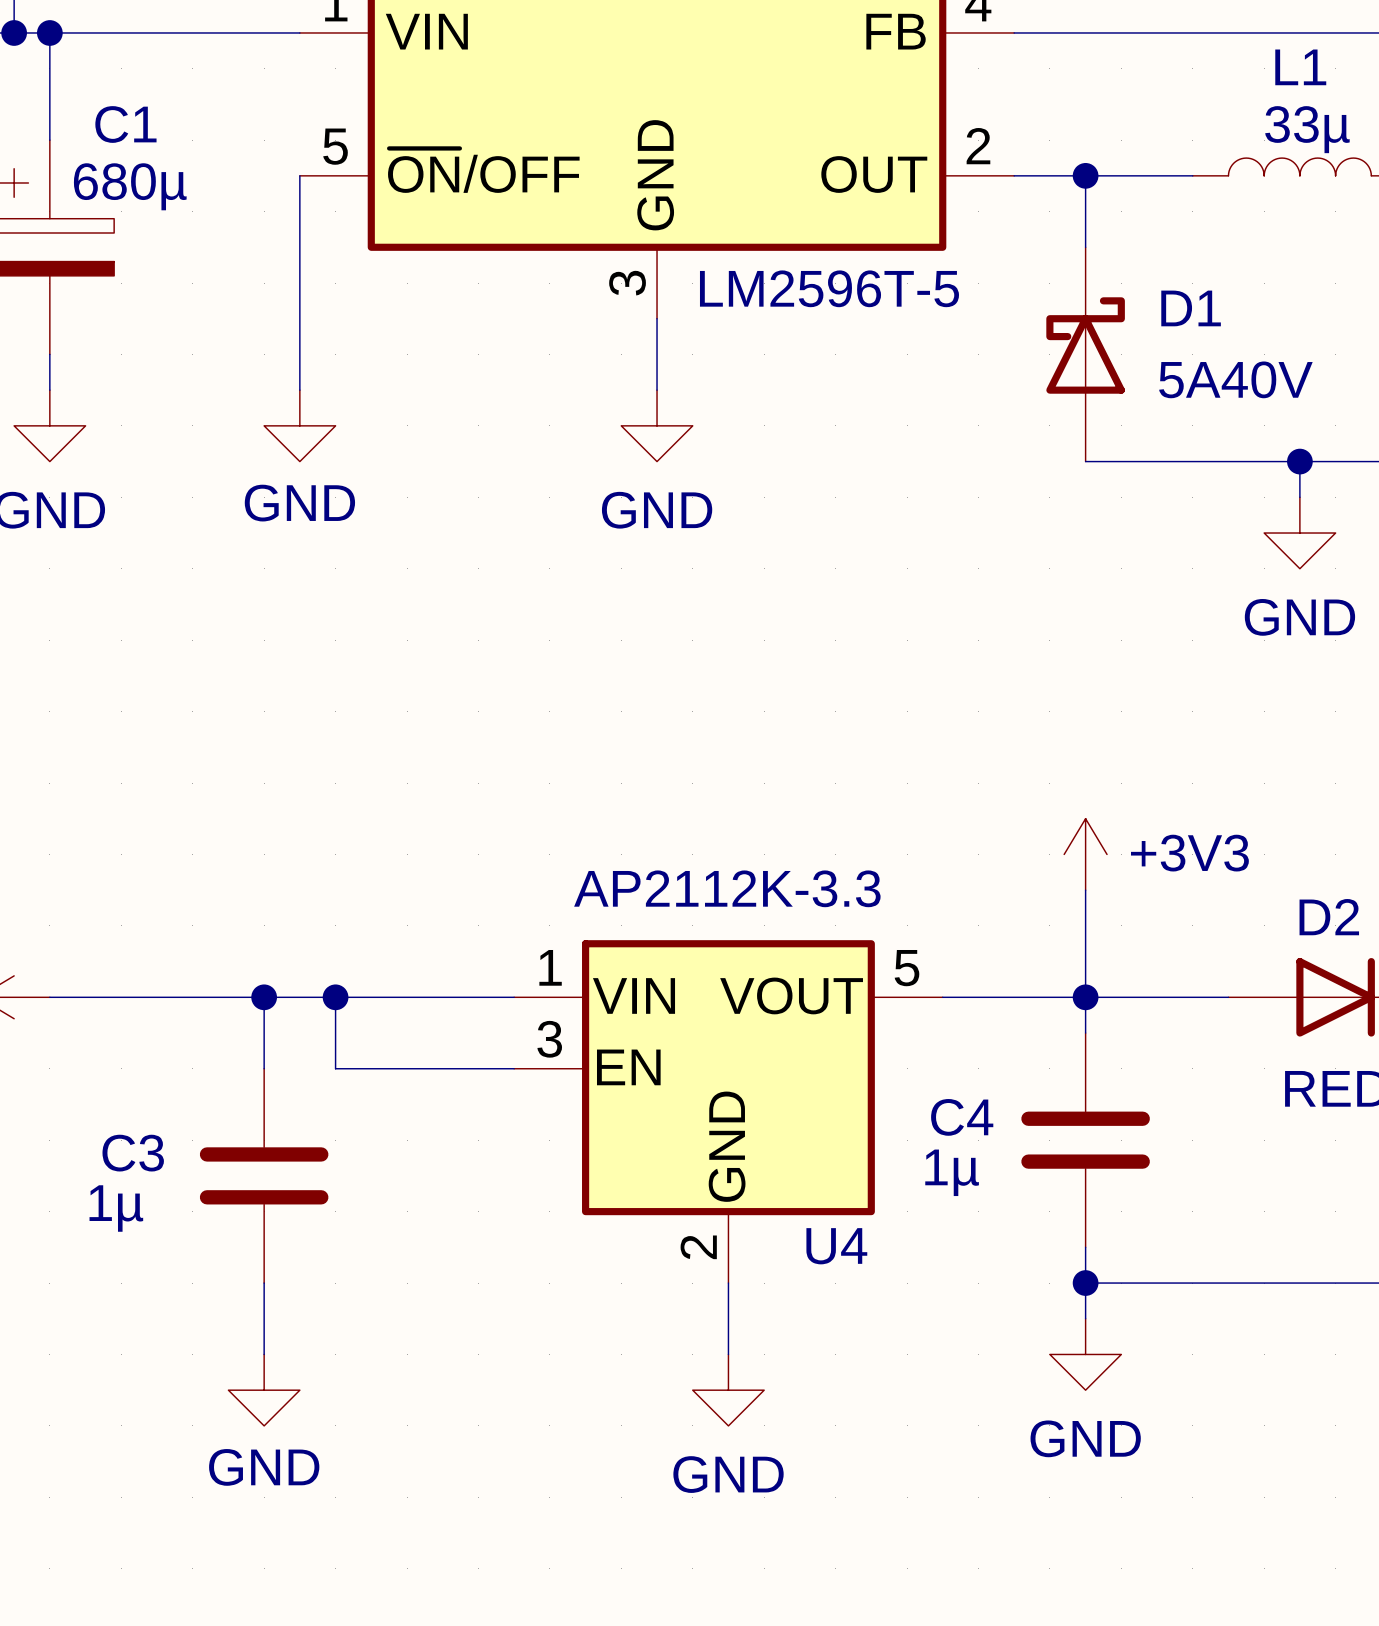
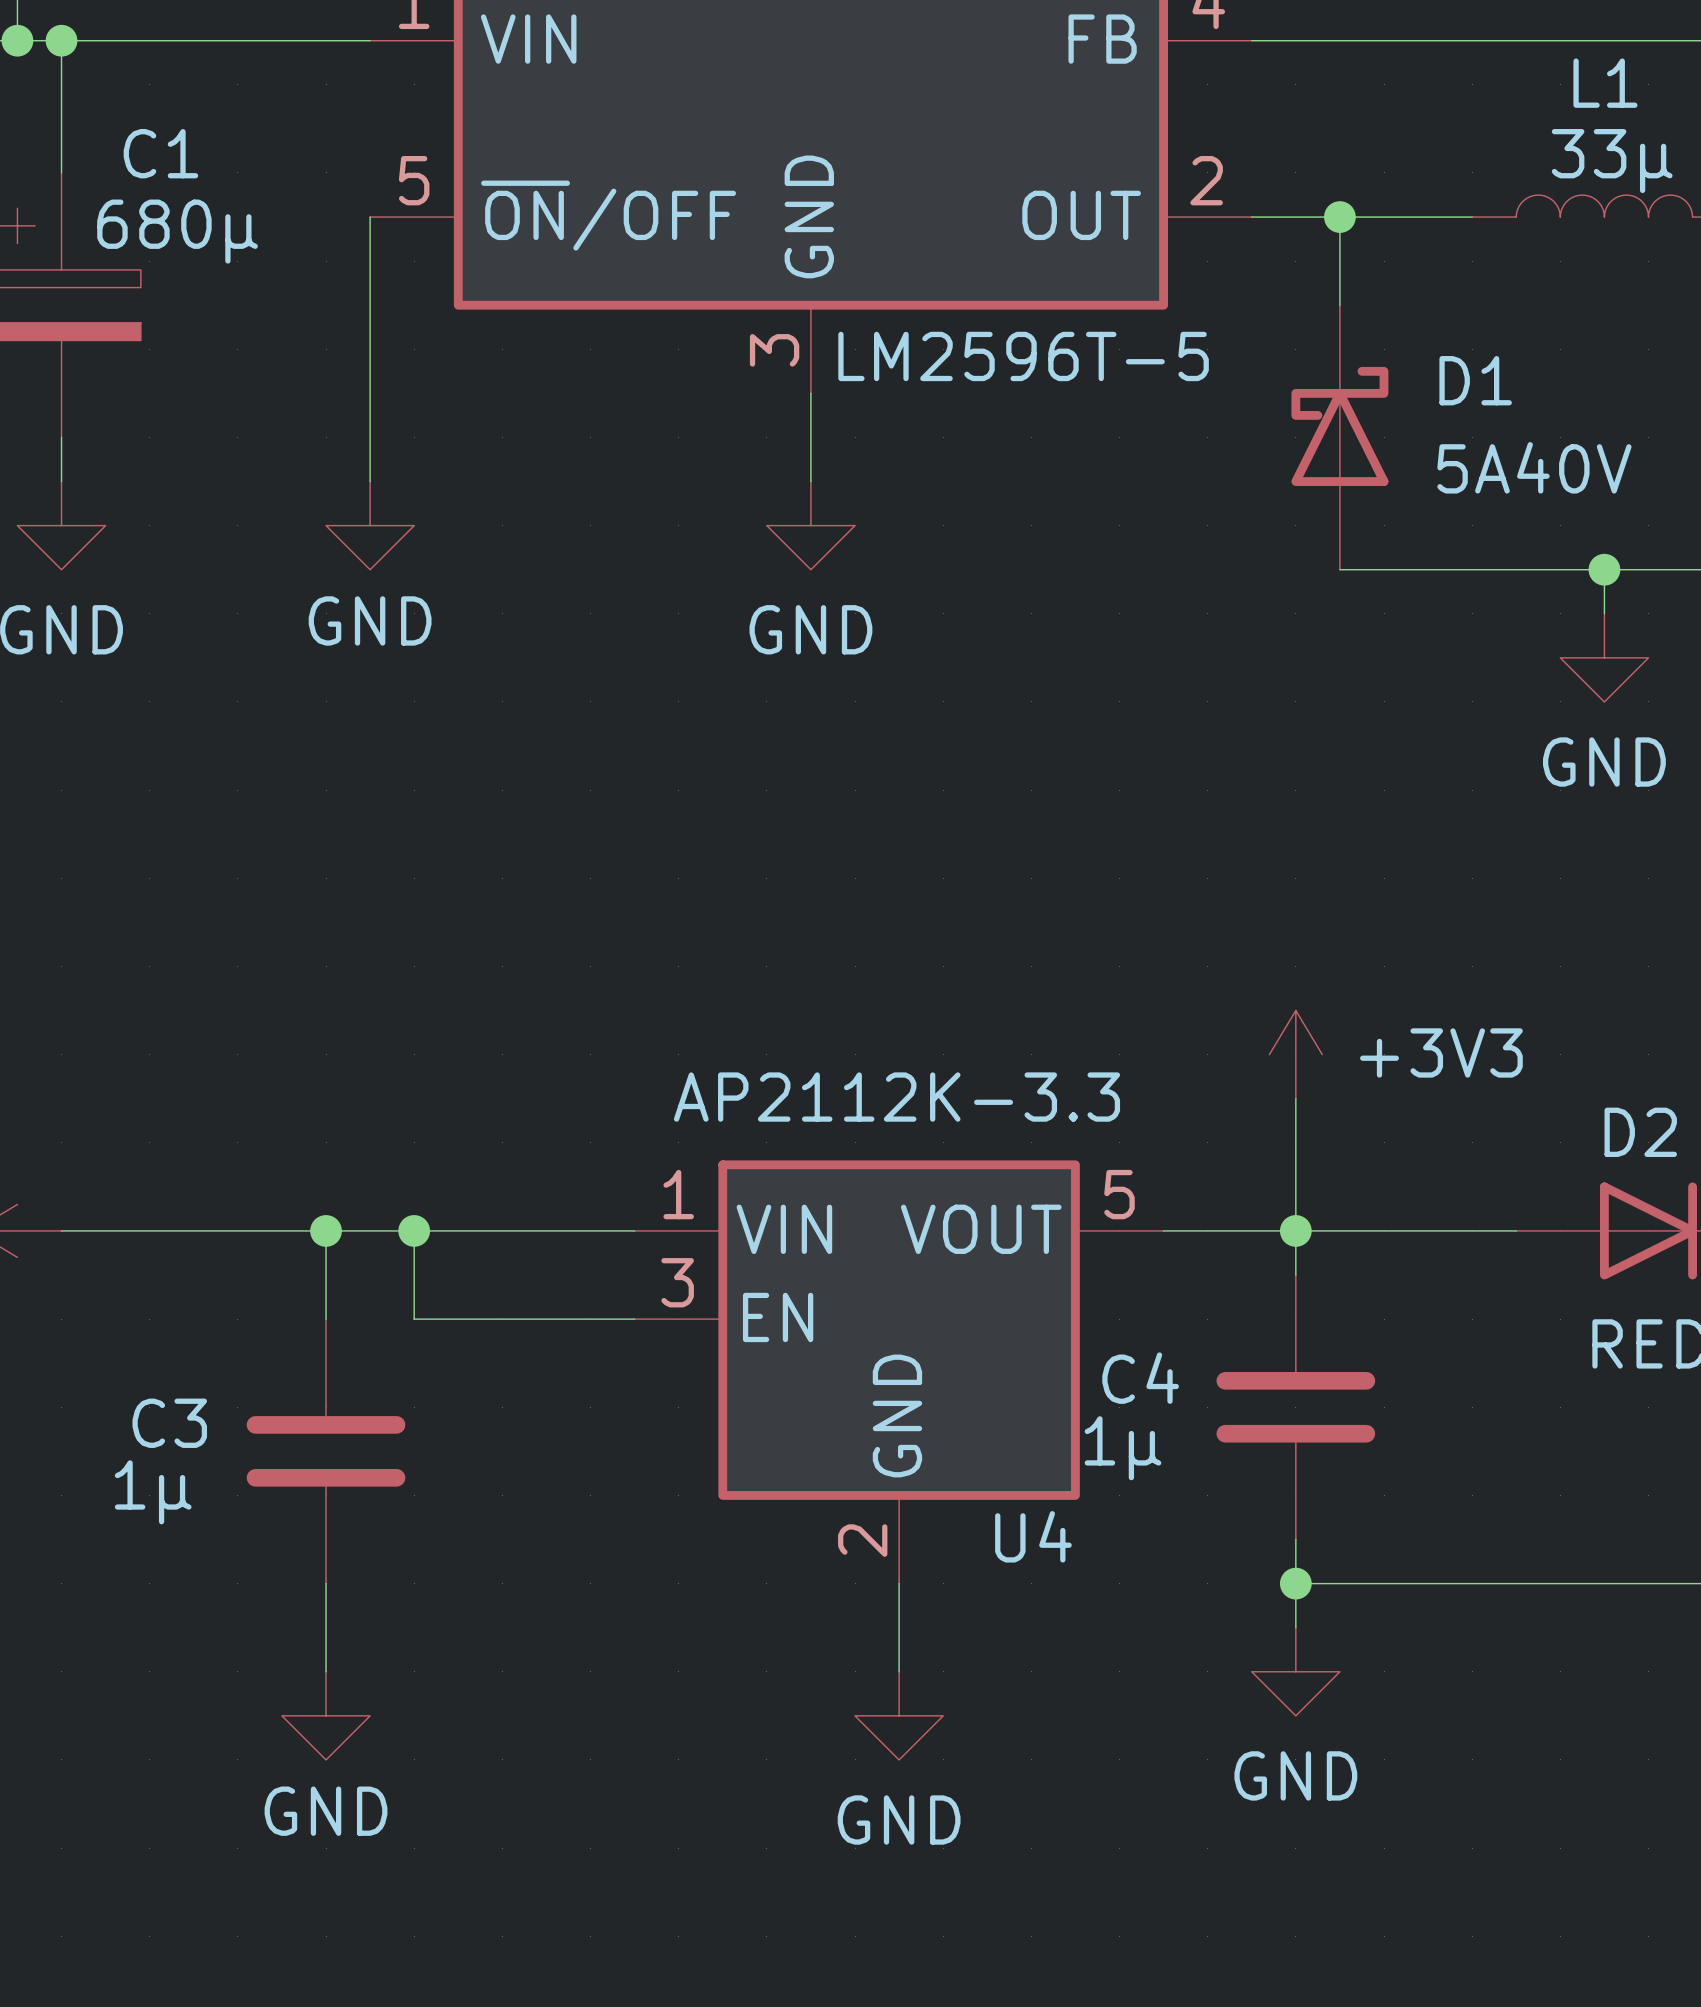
power symbol position: +3V3 (1085, 854) -> +3V3 (1295, 1054)
wire: (1085, 890) (1085, 1033) -> (1295, 1098) (1295, 1275)
junction position: (1085, 997) -> (1295, 1230)
C4 name position: C4 (962, 1117) -> C4 (1140, 1378)
C4 position: (1085, 1140) -> (1295, 1407)
C4 value position: 1µ (952, 1172) -> 1µ (1122, 1448)
wire: (1085, 1247) (1085, 1318) -> (1295, 1539) (1295, 1627)
wire: none -> (1295, 1583) (1339, 1583)
junction position: (1085, 1283) -> (1295, 1583)
power symbol position: GND (1085, 1354) -> GND (1295, 1671)

